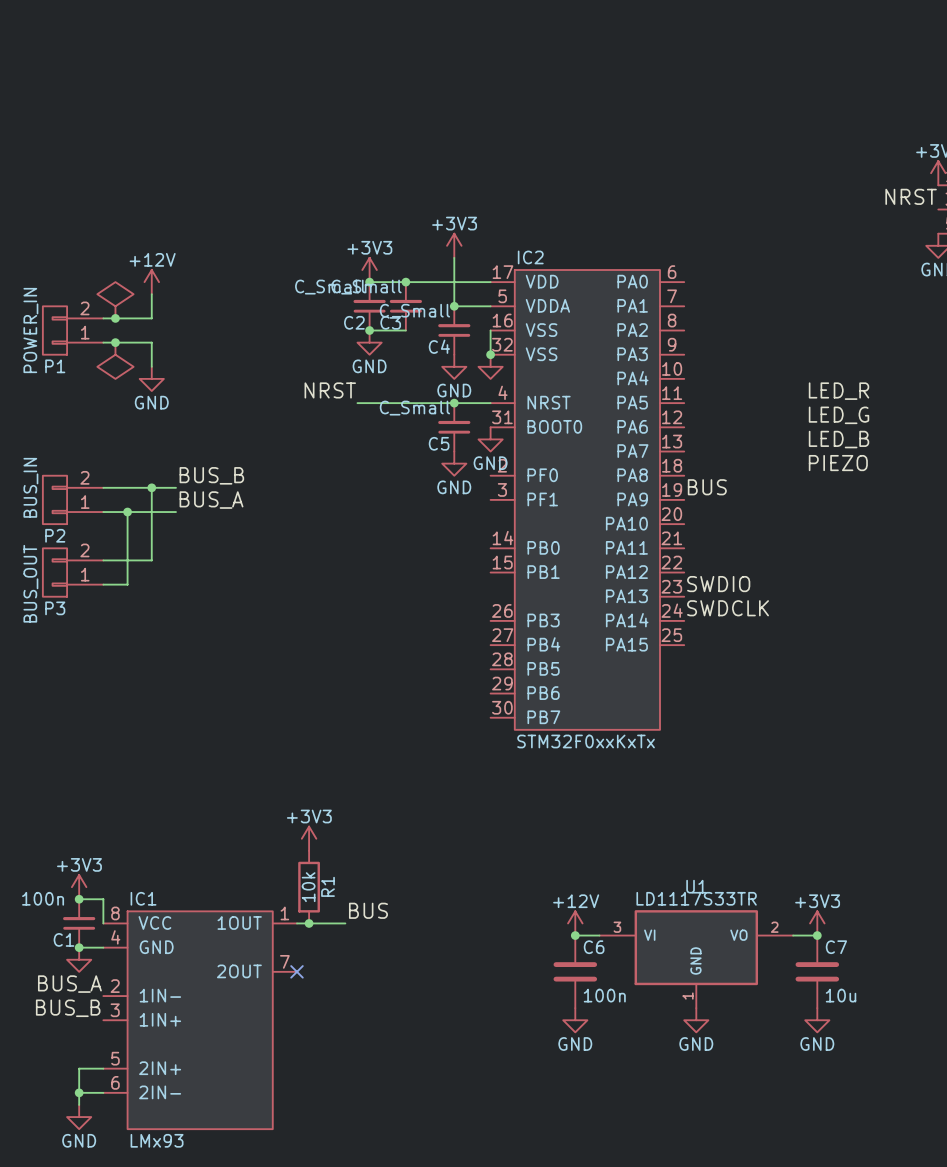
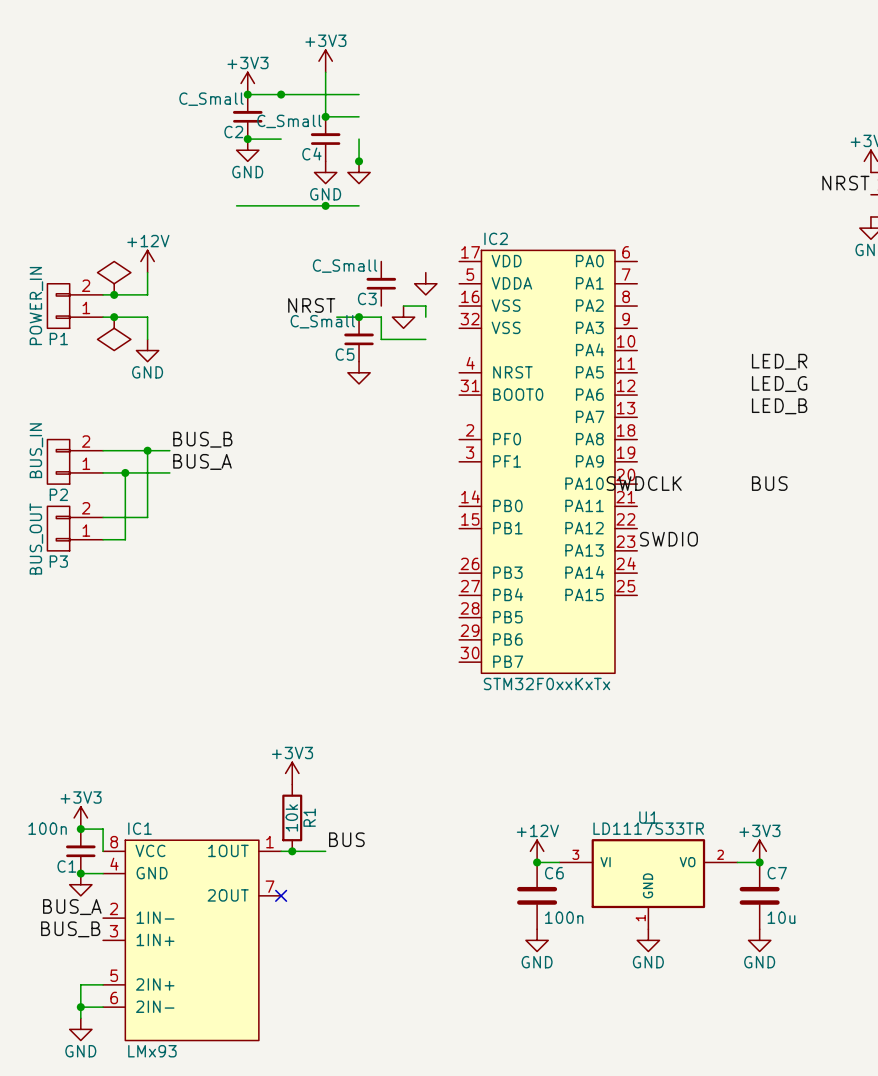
power symbol: none -> +3V3 (325, 61)
power symbol: none -> +3V3 (247, 83)
junction: none -> (247, 94)
junction: none -> (281, 94)
junction: none -> (325, 116)
junction: none -> (247, 139)
power symbol: none -> GND (247, 150)
junction: none -> (359, 161)
power symbol: none -> GND (325, 172)
power symbol: none -> (359, 172)
junction: none -> (325, 205)
power symbol: +3V3 (454, 245) -> none
wire: (454, 257) (454, 306) (490, 306) -> (325, 72) (325, 116) (359, 116)
power symbol: +3V3 (369, 270) -> none
wire: (369, 282) (490, 282) -> (247, 94) (359, 94)
junction: (369, 282) -> none
junction: (405, 282) -> none
C2 position: (369, 306) -> (247, 116)
power symbol: none -> (425, 283)
junction: (454, 306) -> none
wire: (369, 330) (405, 330) -> (247, 139) (281, 139)
junction position: (369, 330) -> (359, 317)
wire: none -> (403, 306) (425, 306) (425, 317)
C4 position: (454, 330) -> (325, 139)
wire: (490, 330) (490, 354) -> (359, 139) (359, 161)
wire: none -> (336, 317) (381, 317) (381, 339) (425, 339)
power symbol: GND (369, 342) -> none
power symbol: none -> (403, 317)
junction: (490, 354) -> none
power symbol: GND (454, 366) -> none
power symbol: (490, 366) -> none
label position: NRST (330, 390) -> NRST (311, 305)
wire: (357, 403) (490, 403) -> (236, 205) (359, 205)
power symbol: none -> (359, 372)
junction: (454, 403) -> none
C5 position: (454, 427) -> (359, 339)
power symbol: GND (490, 439) -> none
power symbol: GND (454, 463) -> none
label: PIEZO (838, 463) -> none
label position: BUS (707, 487) -> BUS (769, 483)
label position: SWDCLK (728, 608) -> SWDCLK (644, 483)

